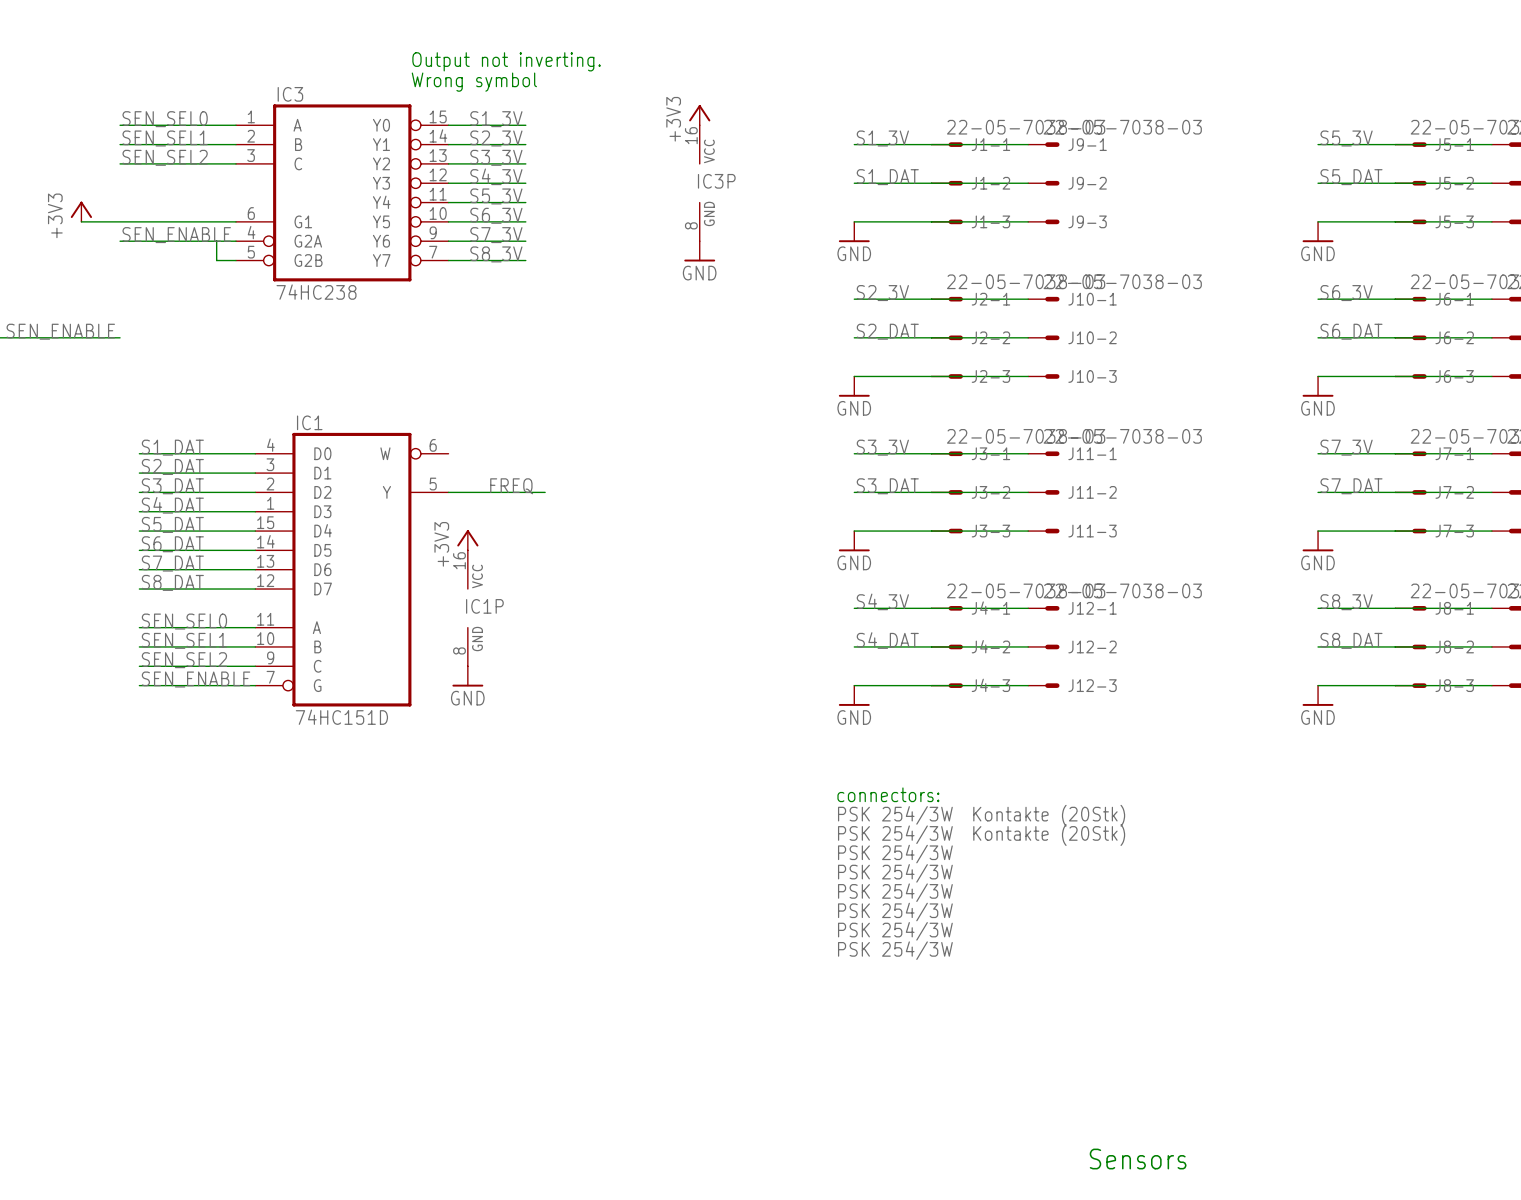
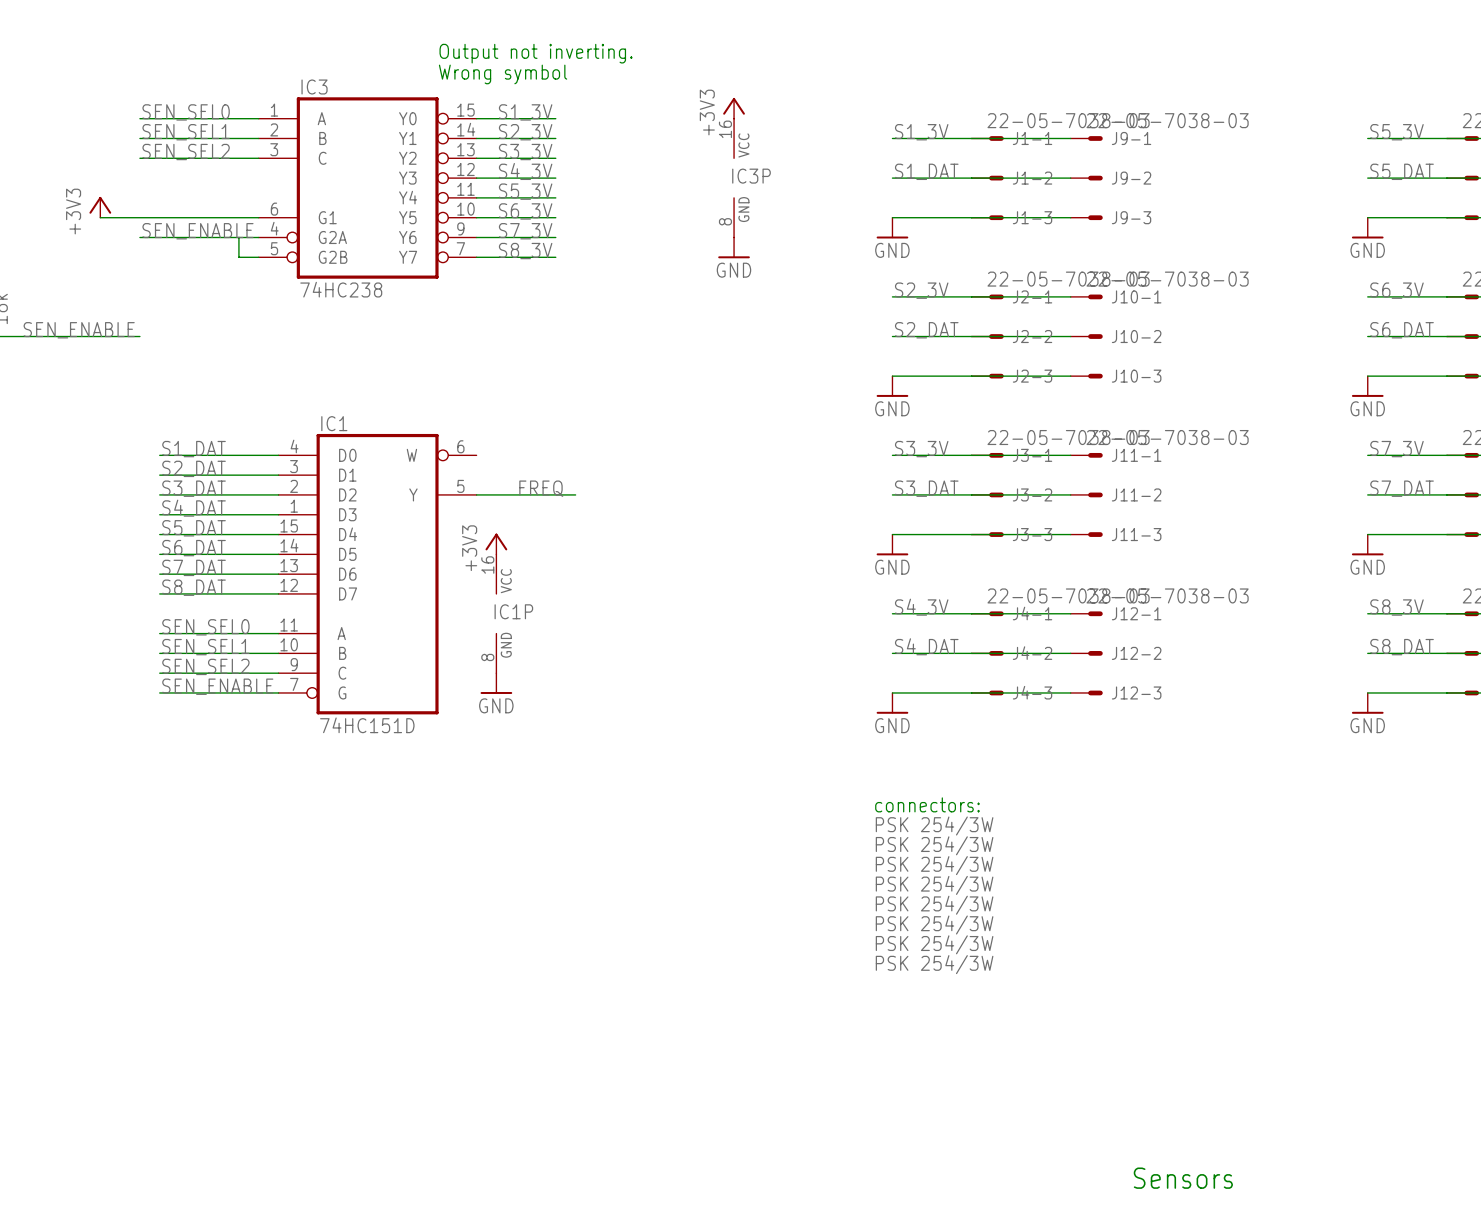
part: Kontakte (20Stk) (1049, 815) -> none
part: Kontakte (20Stk) (1049, 835) -> none

